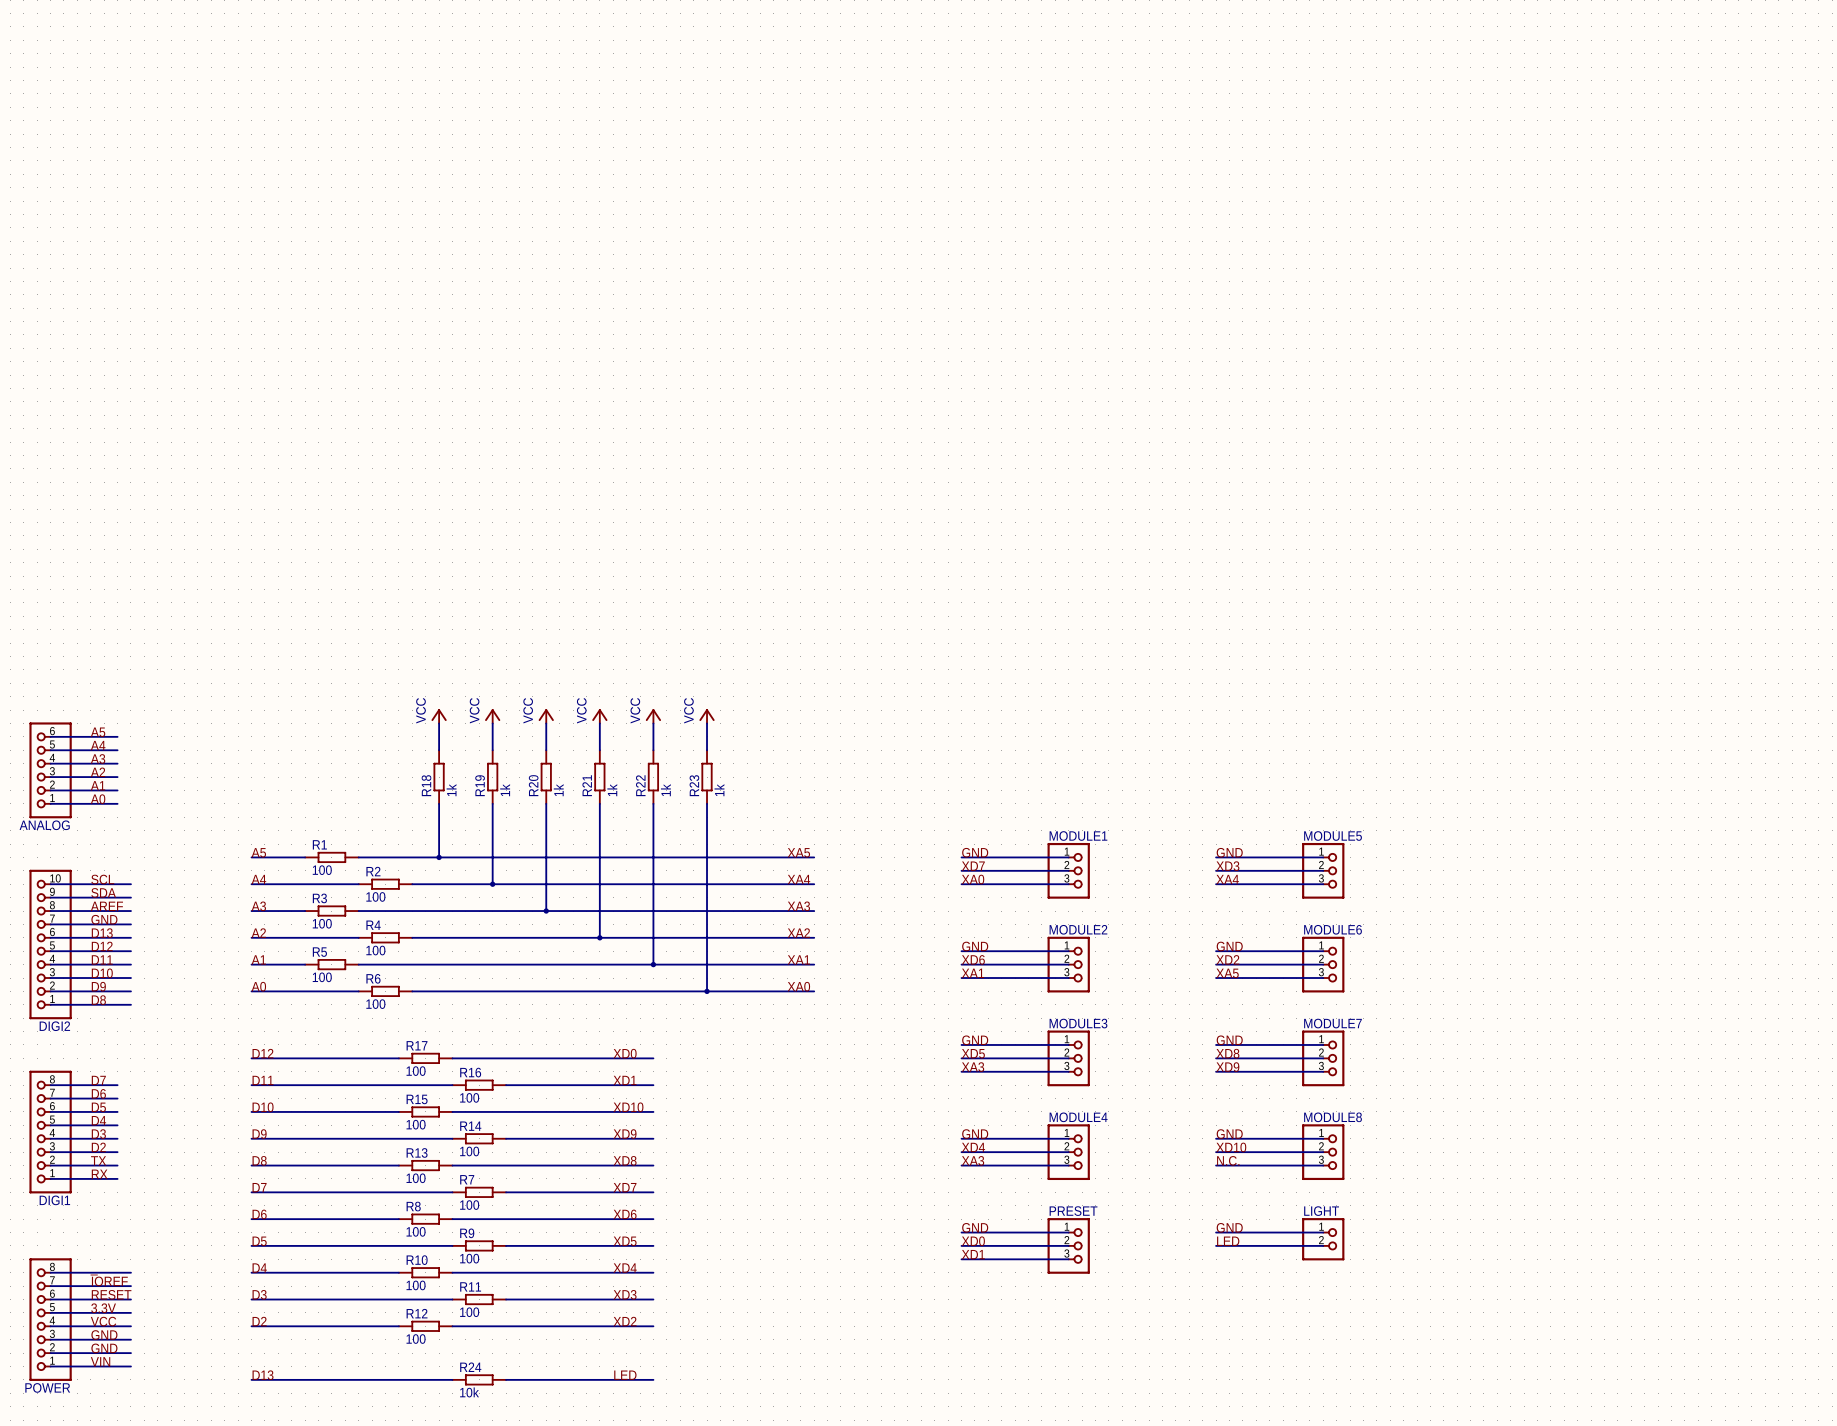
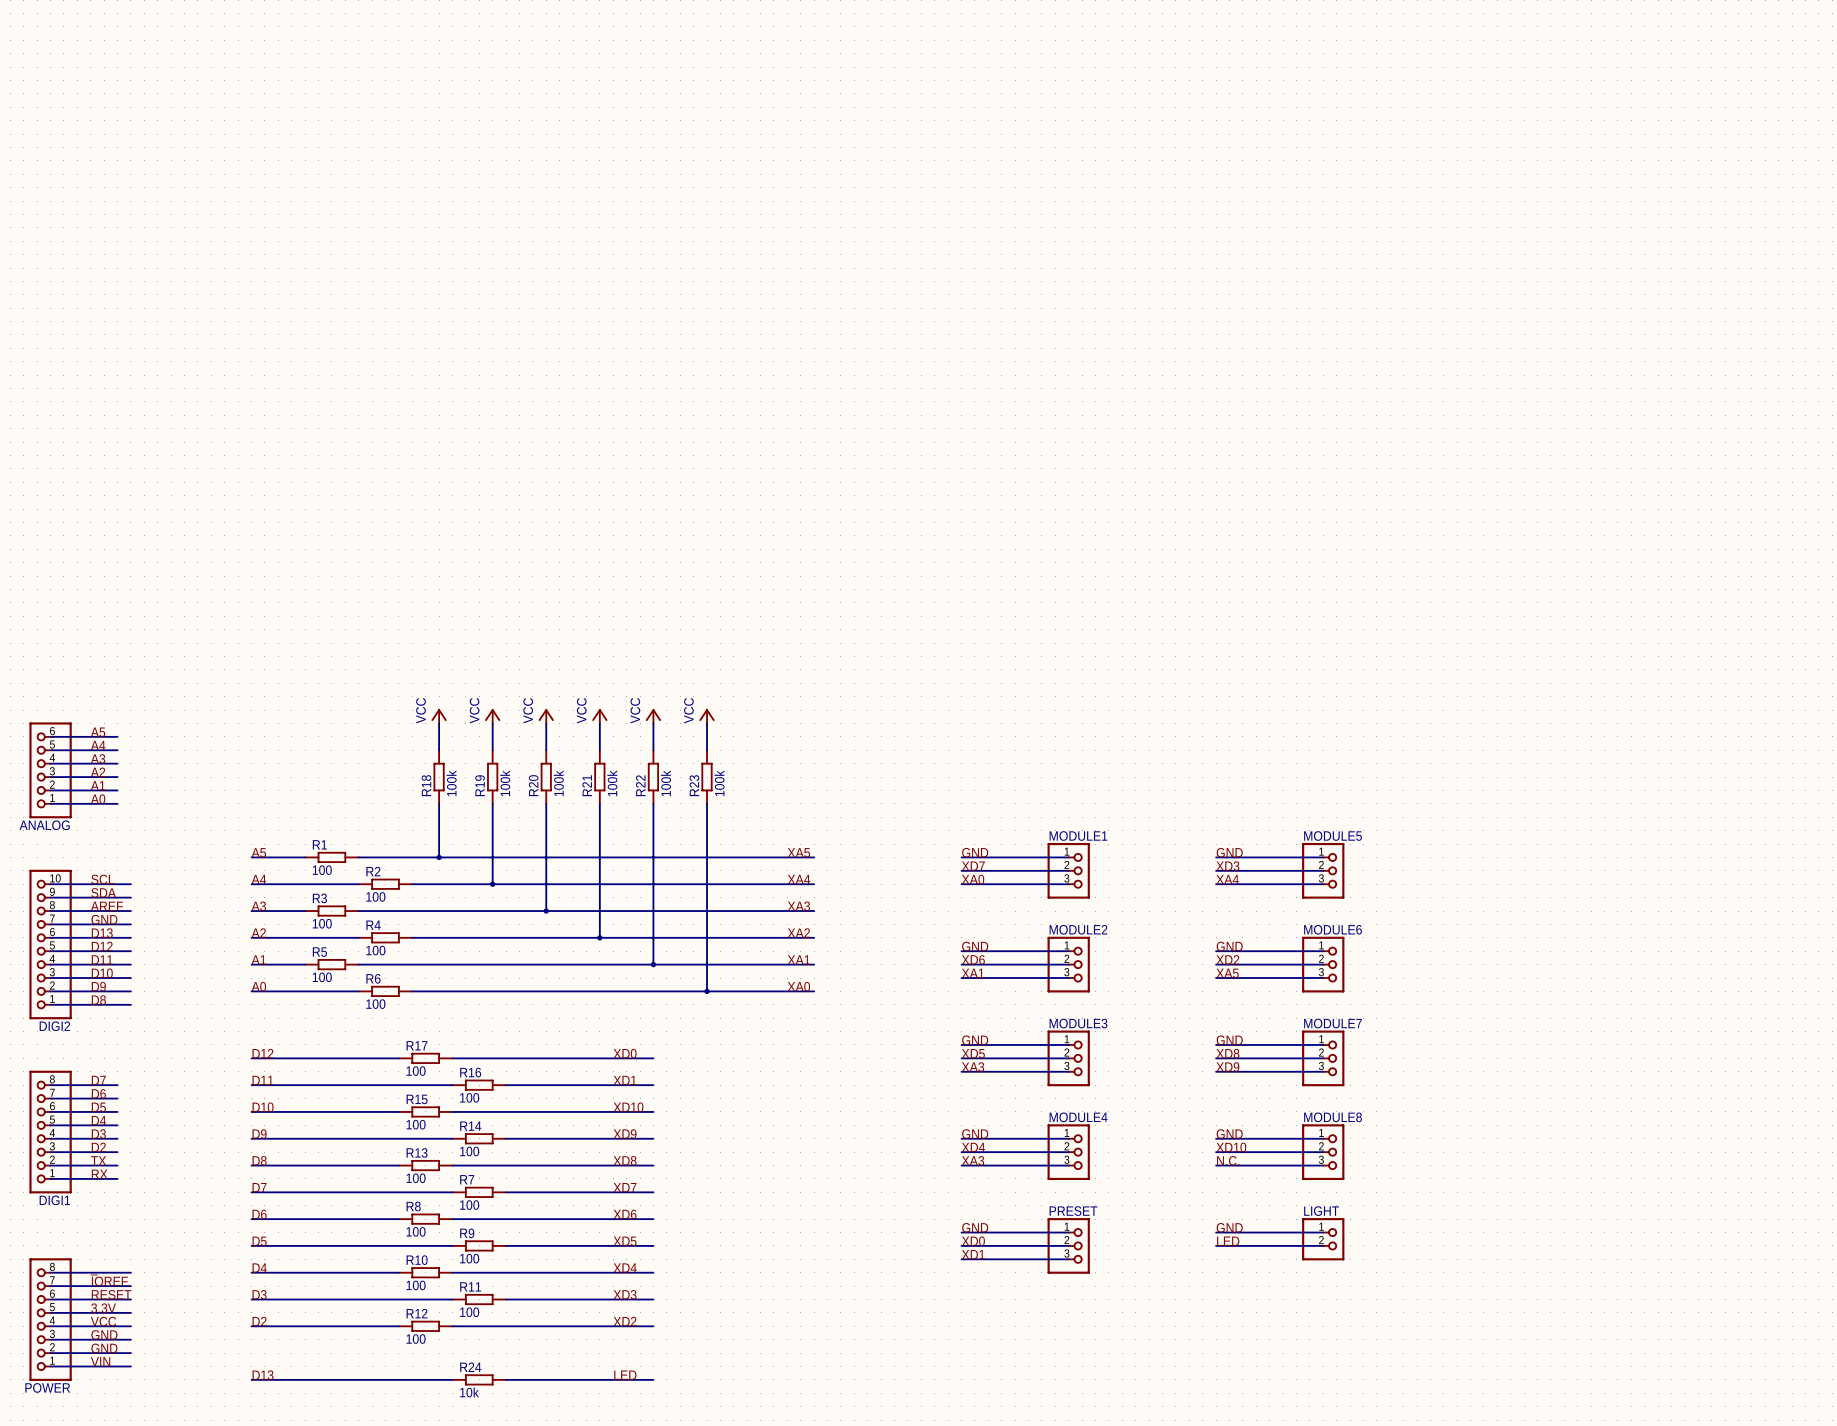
R18 value: 1k (451, 790) -> 100k (451, 783)
R19 value: 1k (505, 790) -> 100k (505, 783)
R20 value: 1k (558, 790) -> 100k (558, 783)
R21 value: 1k (612, 790) -> 100k (612, 783)
R22 value: 1k (665, 790) -> 100k (665, 783)
R23 value: 1k (719, 790) -> 100k (719, 783)

